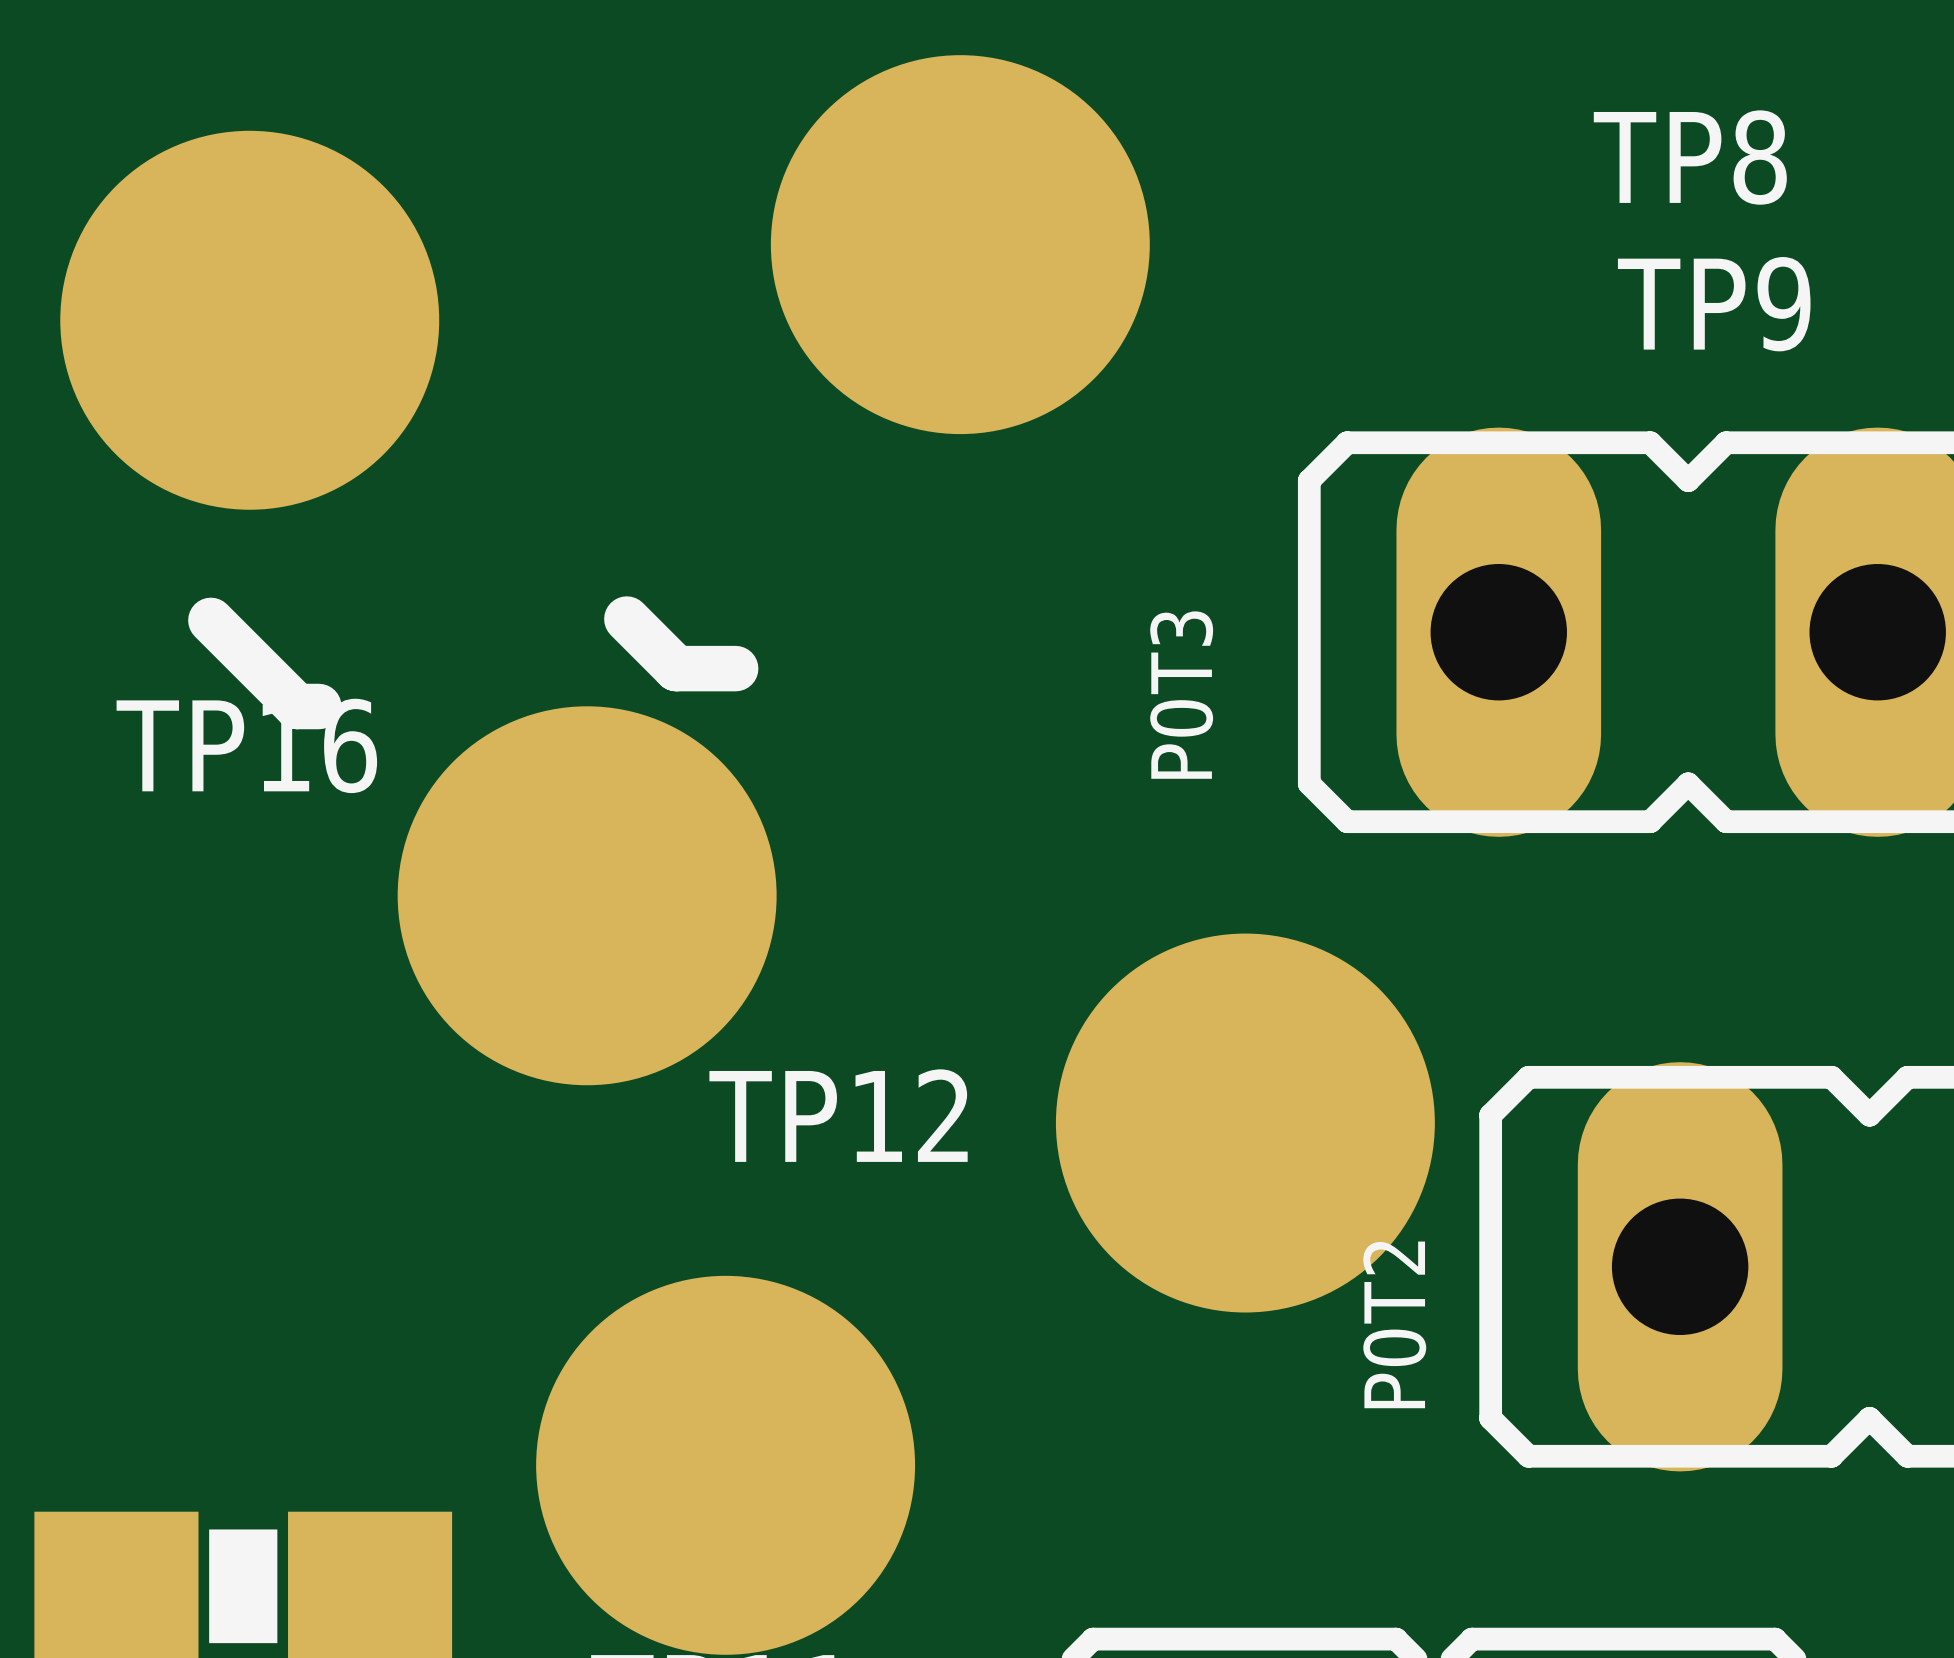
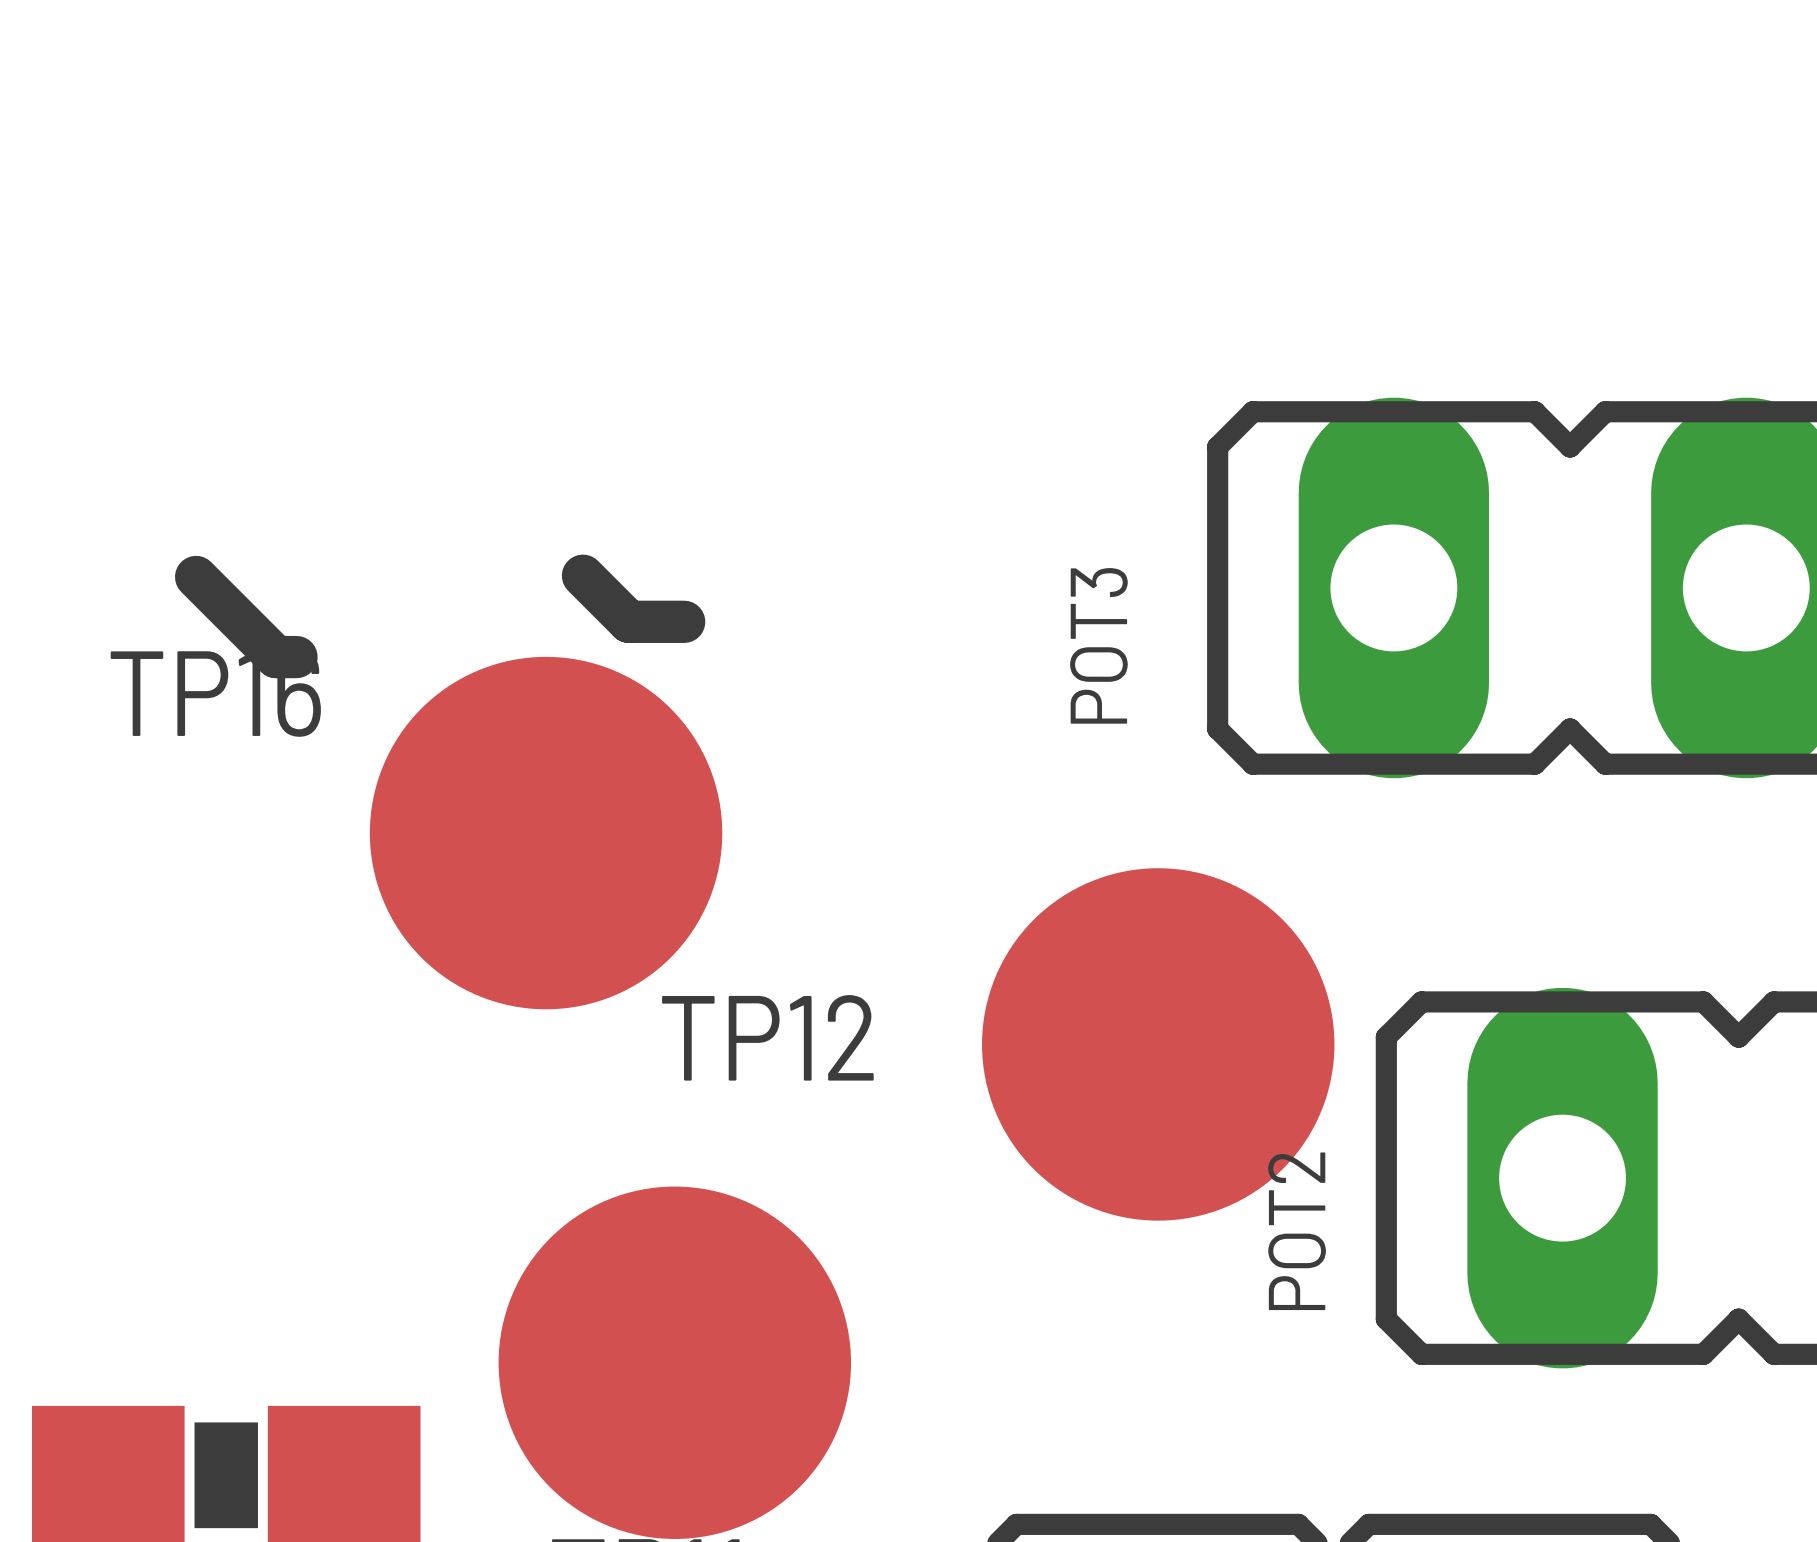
TP8: (960, 244) -> none
TP9: (249, 320) -> none

